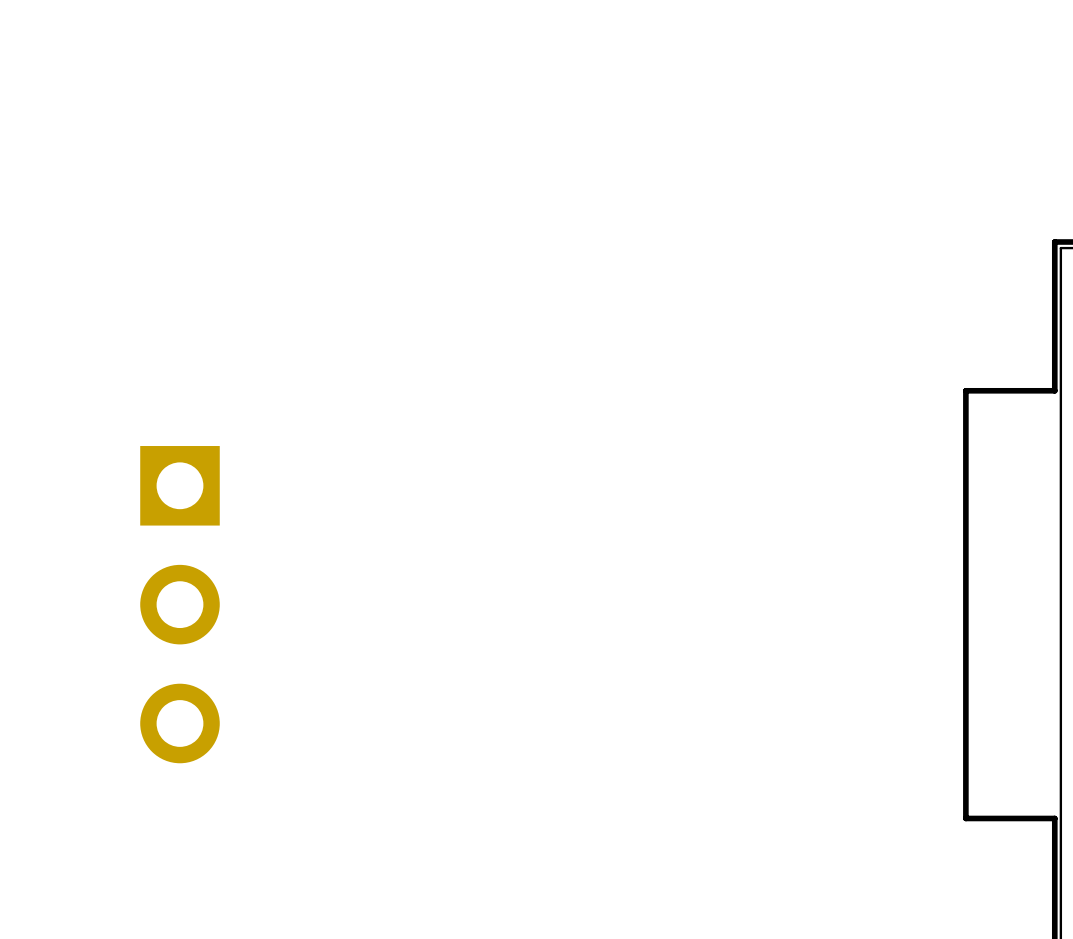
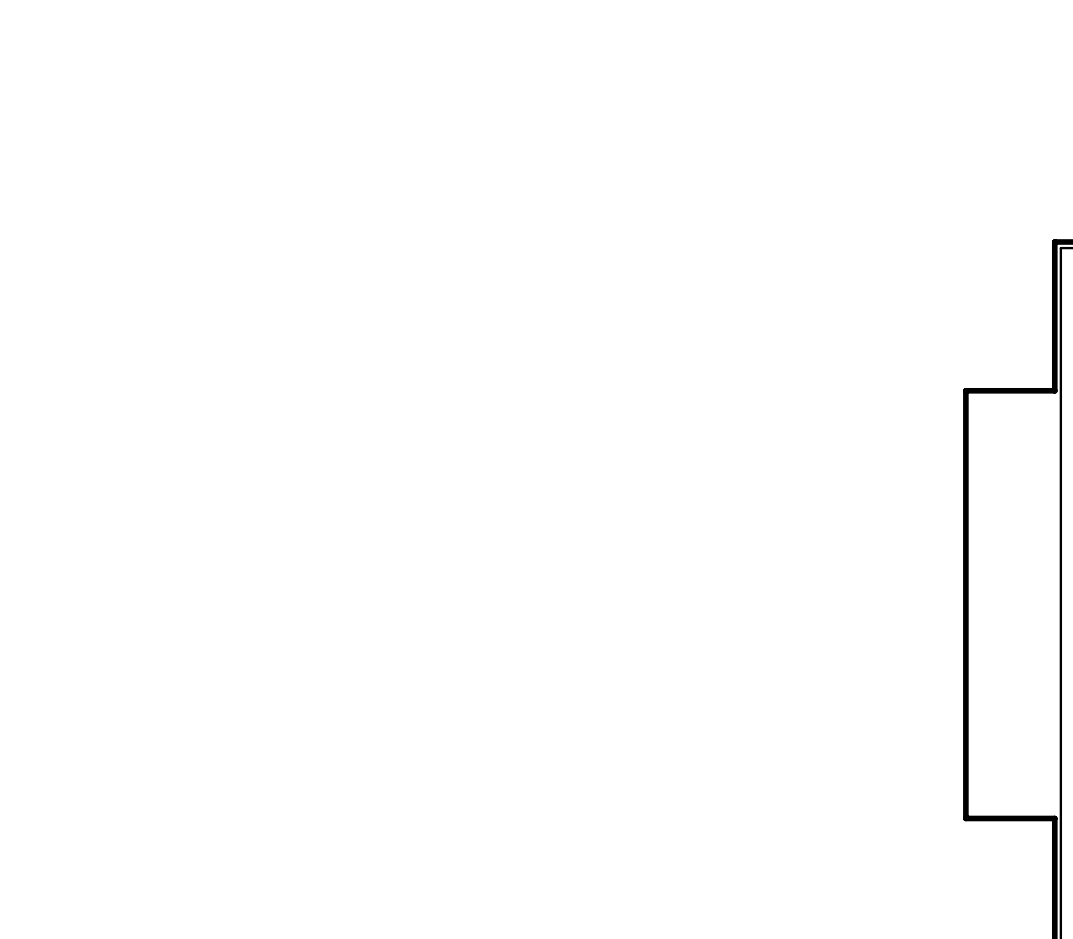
part: (179, 604) -> none

